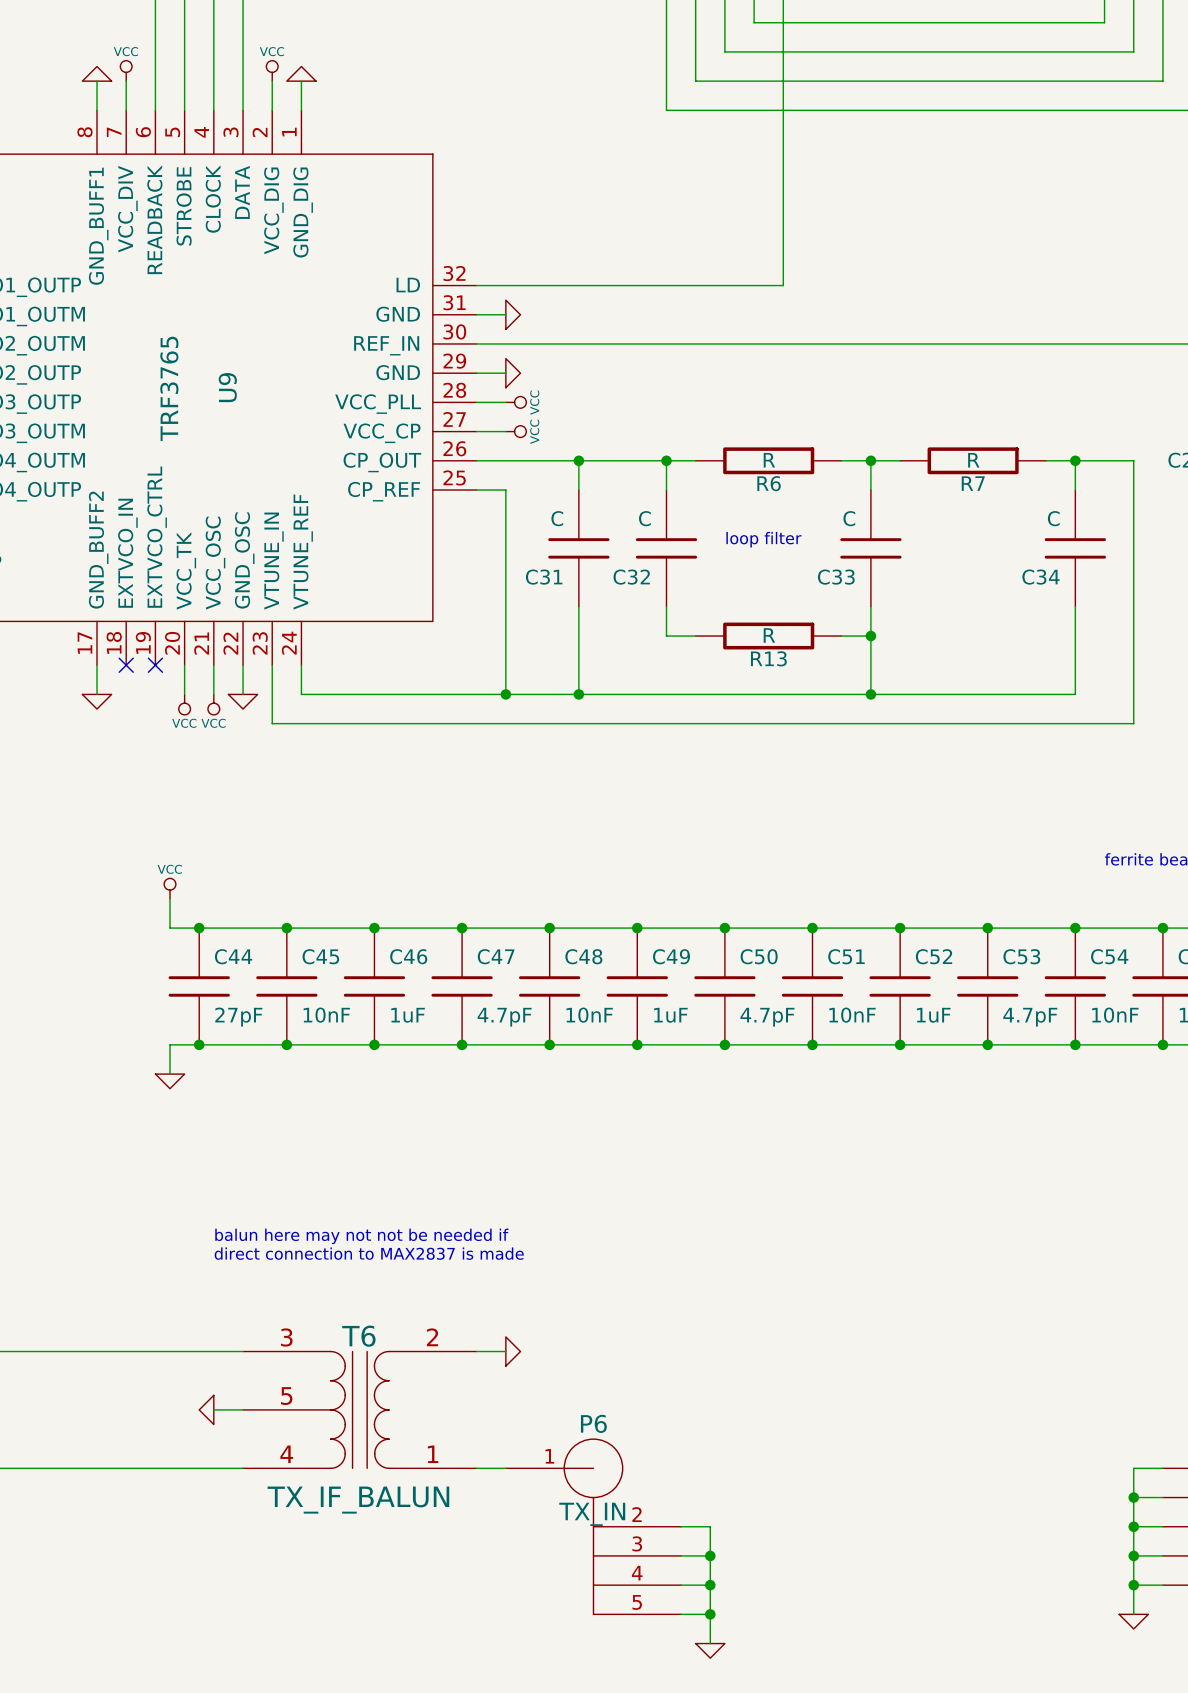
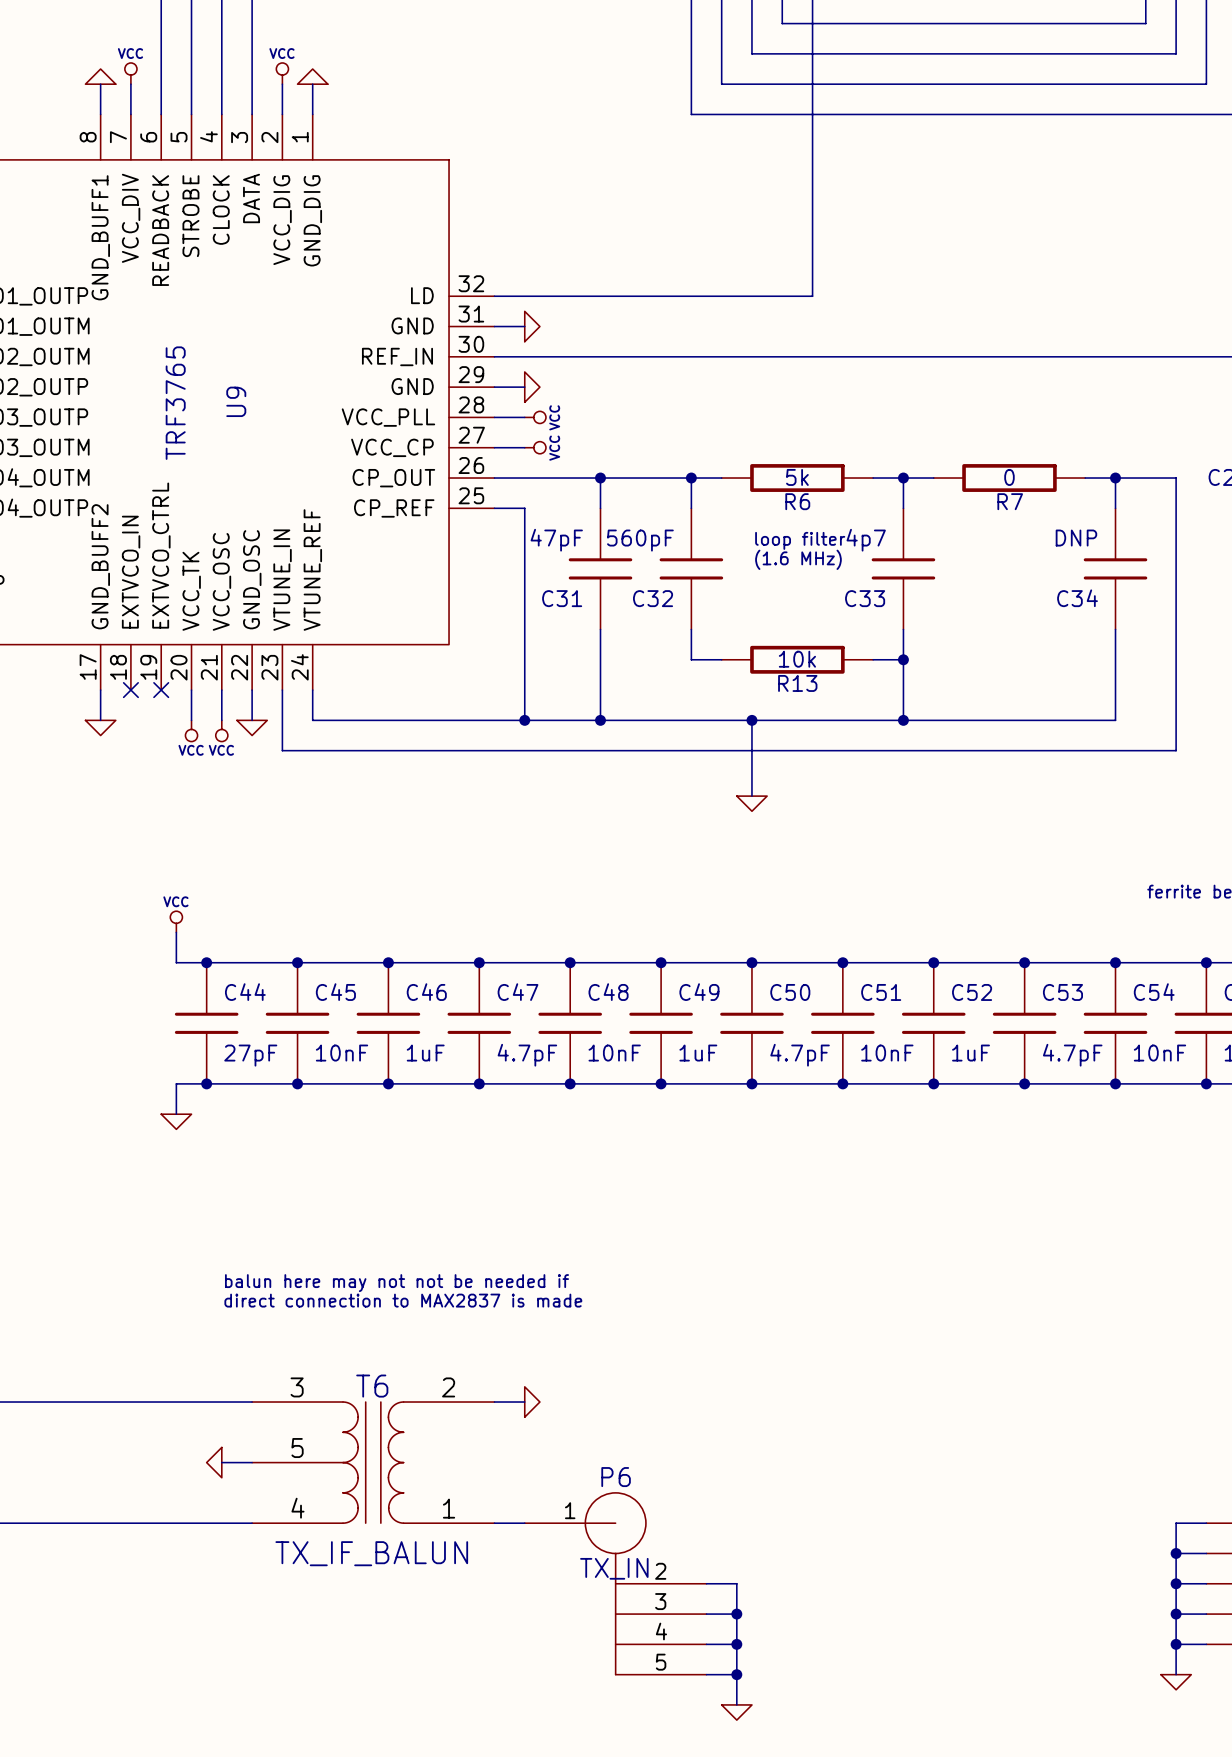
R6 value: R (769, 460) -> 5k (797, 477)
R7 value: R (973, 460) -> 0 (1009, 477)
C31 value: C (557, 518) -> 47pF (556, 540)
C32 value: C (644, 518) -> 560pF (640, 540)
C33 value: C (849, 518) -> 4p7 (866, 540)
C34 value: C (1053, 518) -> DNP (1076, 538)
text: none -> loop filter (800, 540)
text: loop filter (763, 539) -> (1.6 MHz) (798, 559)
R13 value: R (769, 635) -> 10k (797, 659)
wire: none -> (751, 720) (751, 796)
junction: none -> (751, 720)
power symbol: none -> (751, 803)

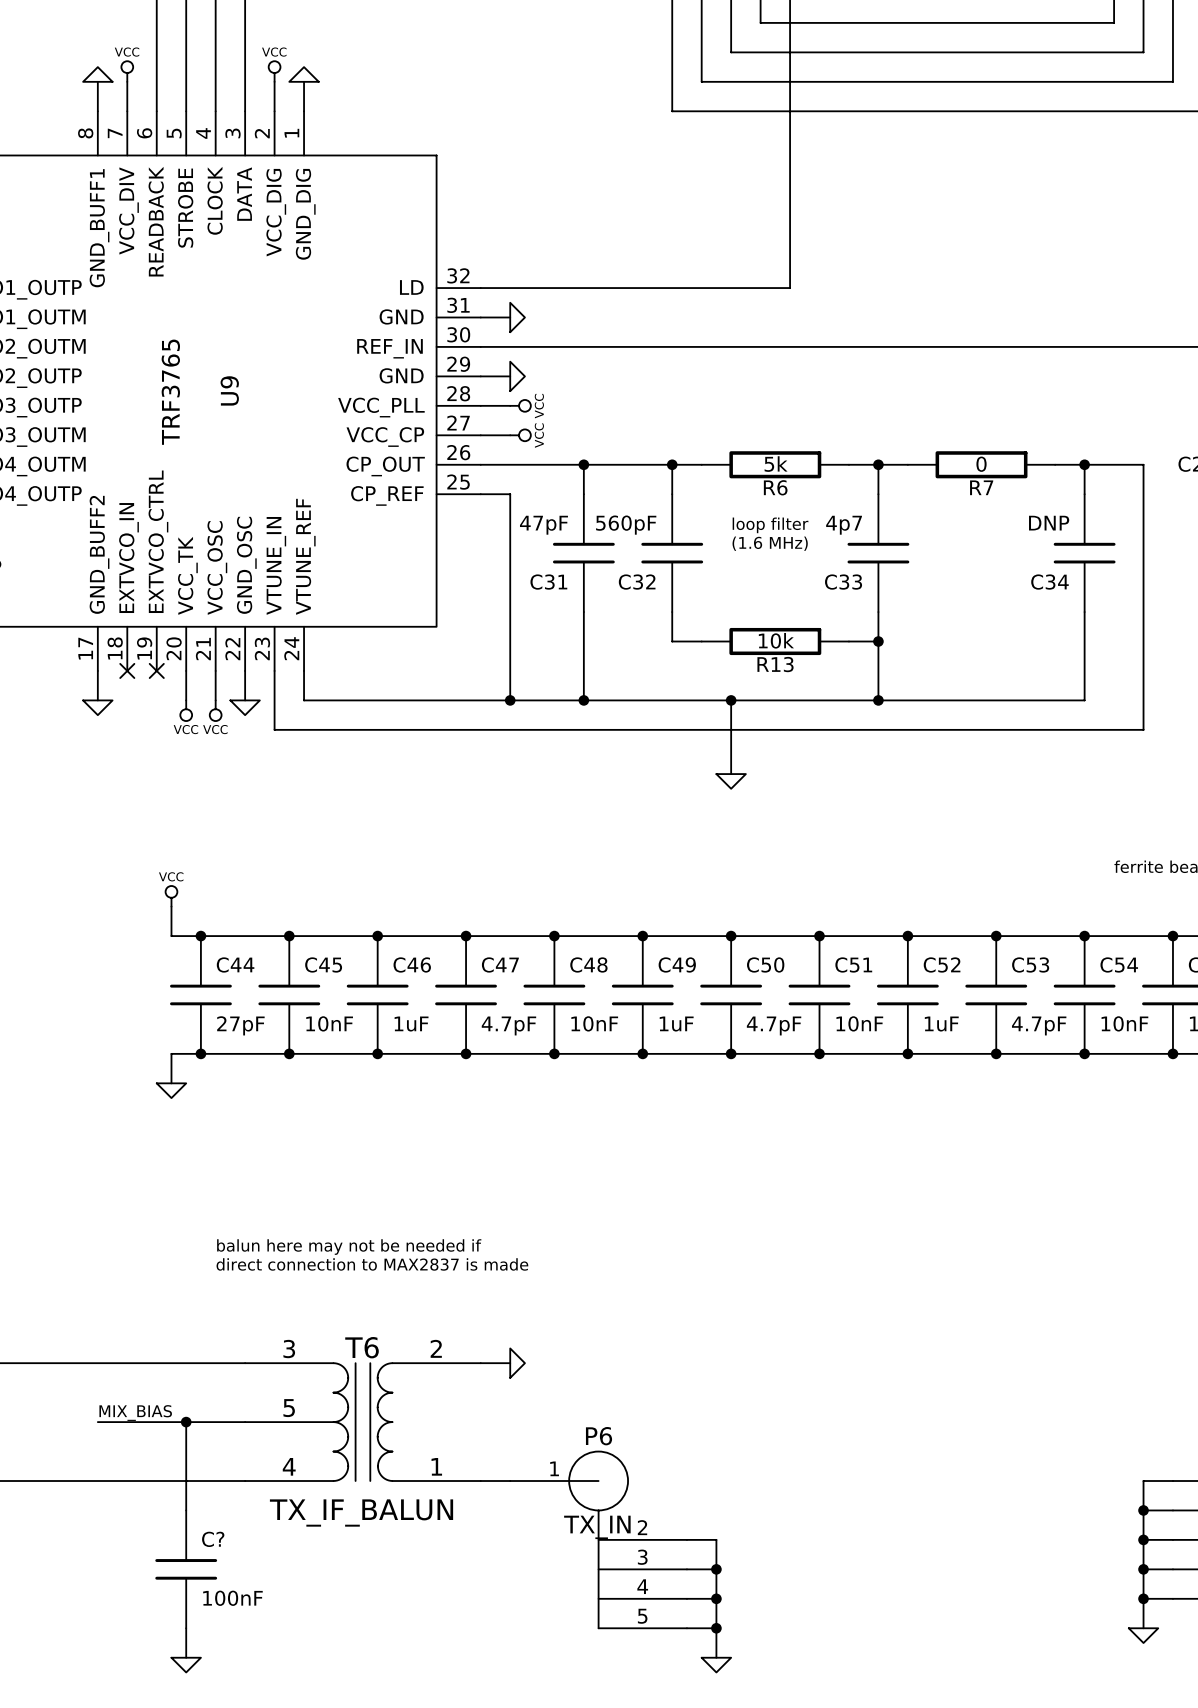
text: balun here may not not be needed if (396, 1283) -> balun here may not be needed if (349, 1247)
label: none -> MIX_BIAS (135, 1413)
wire: none -> (97, 1422) (215, 1422)
wire: none -> (186, 1422) (186, 1510)
junction: none -> (186, 1422)
power symbol rotation: 0° (214, 1462) -> 90° counterclockwise (186, 1665)
power symbol position: (214, 1462) -> (186, 1665)
C?: none -> 100nF (186, 1569)
wire: none -> (186, 1628) (186, 1657)

